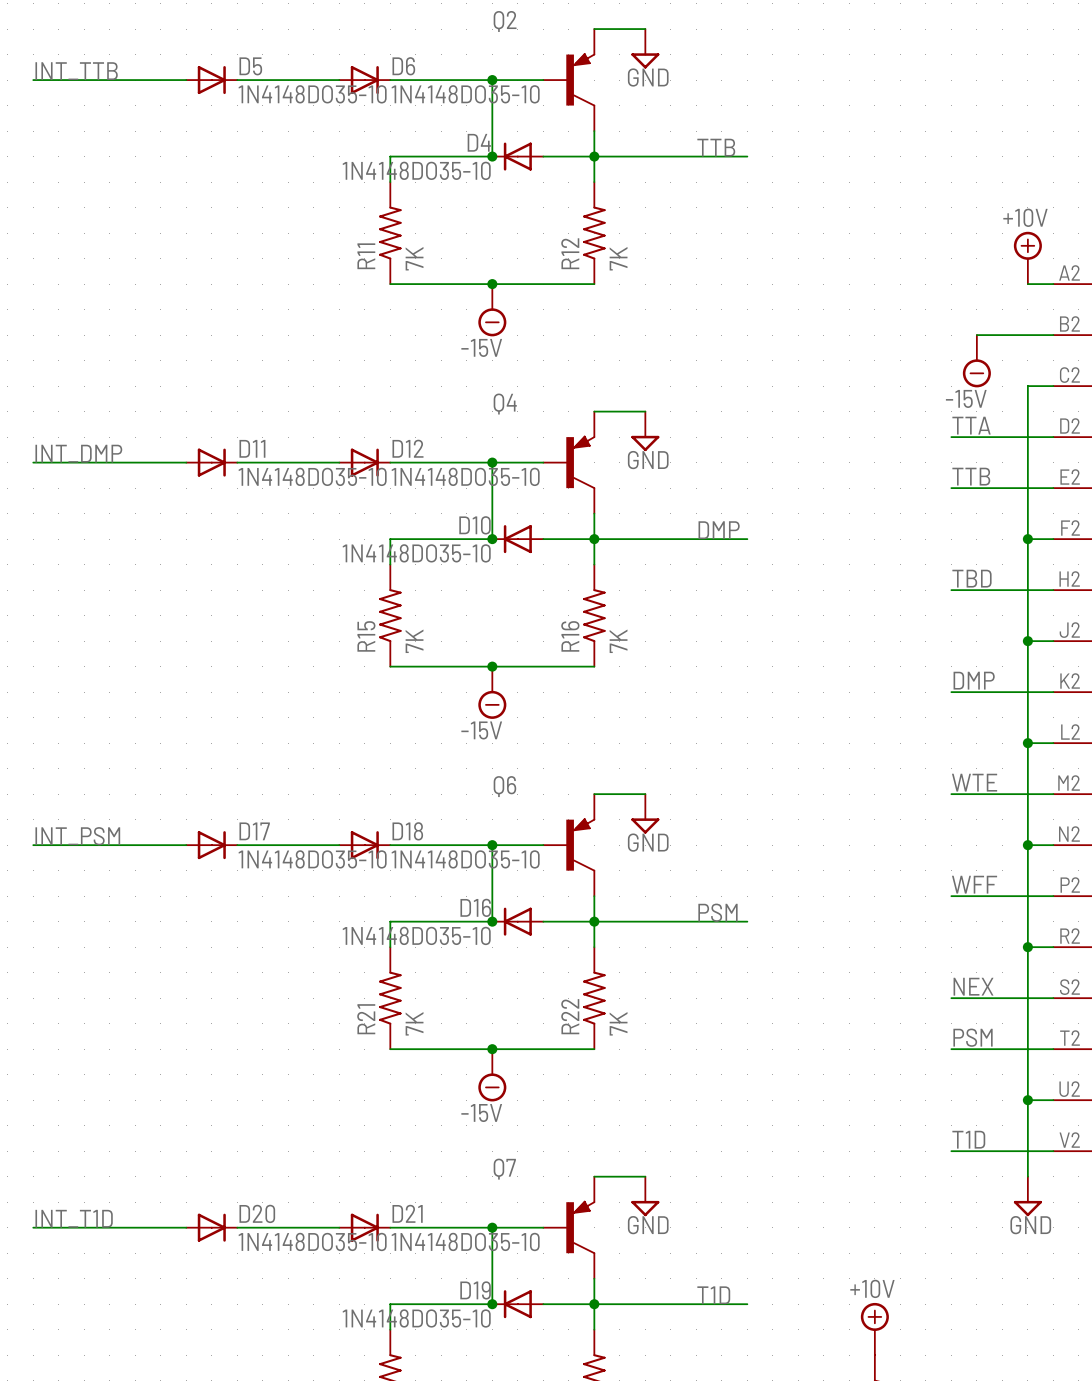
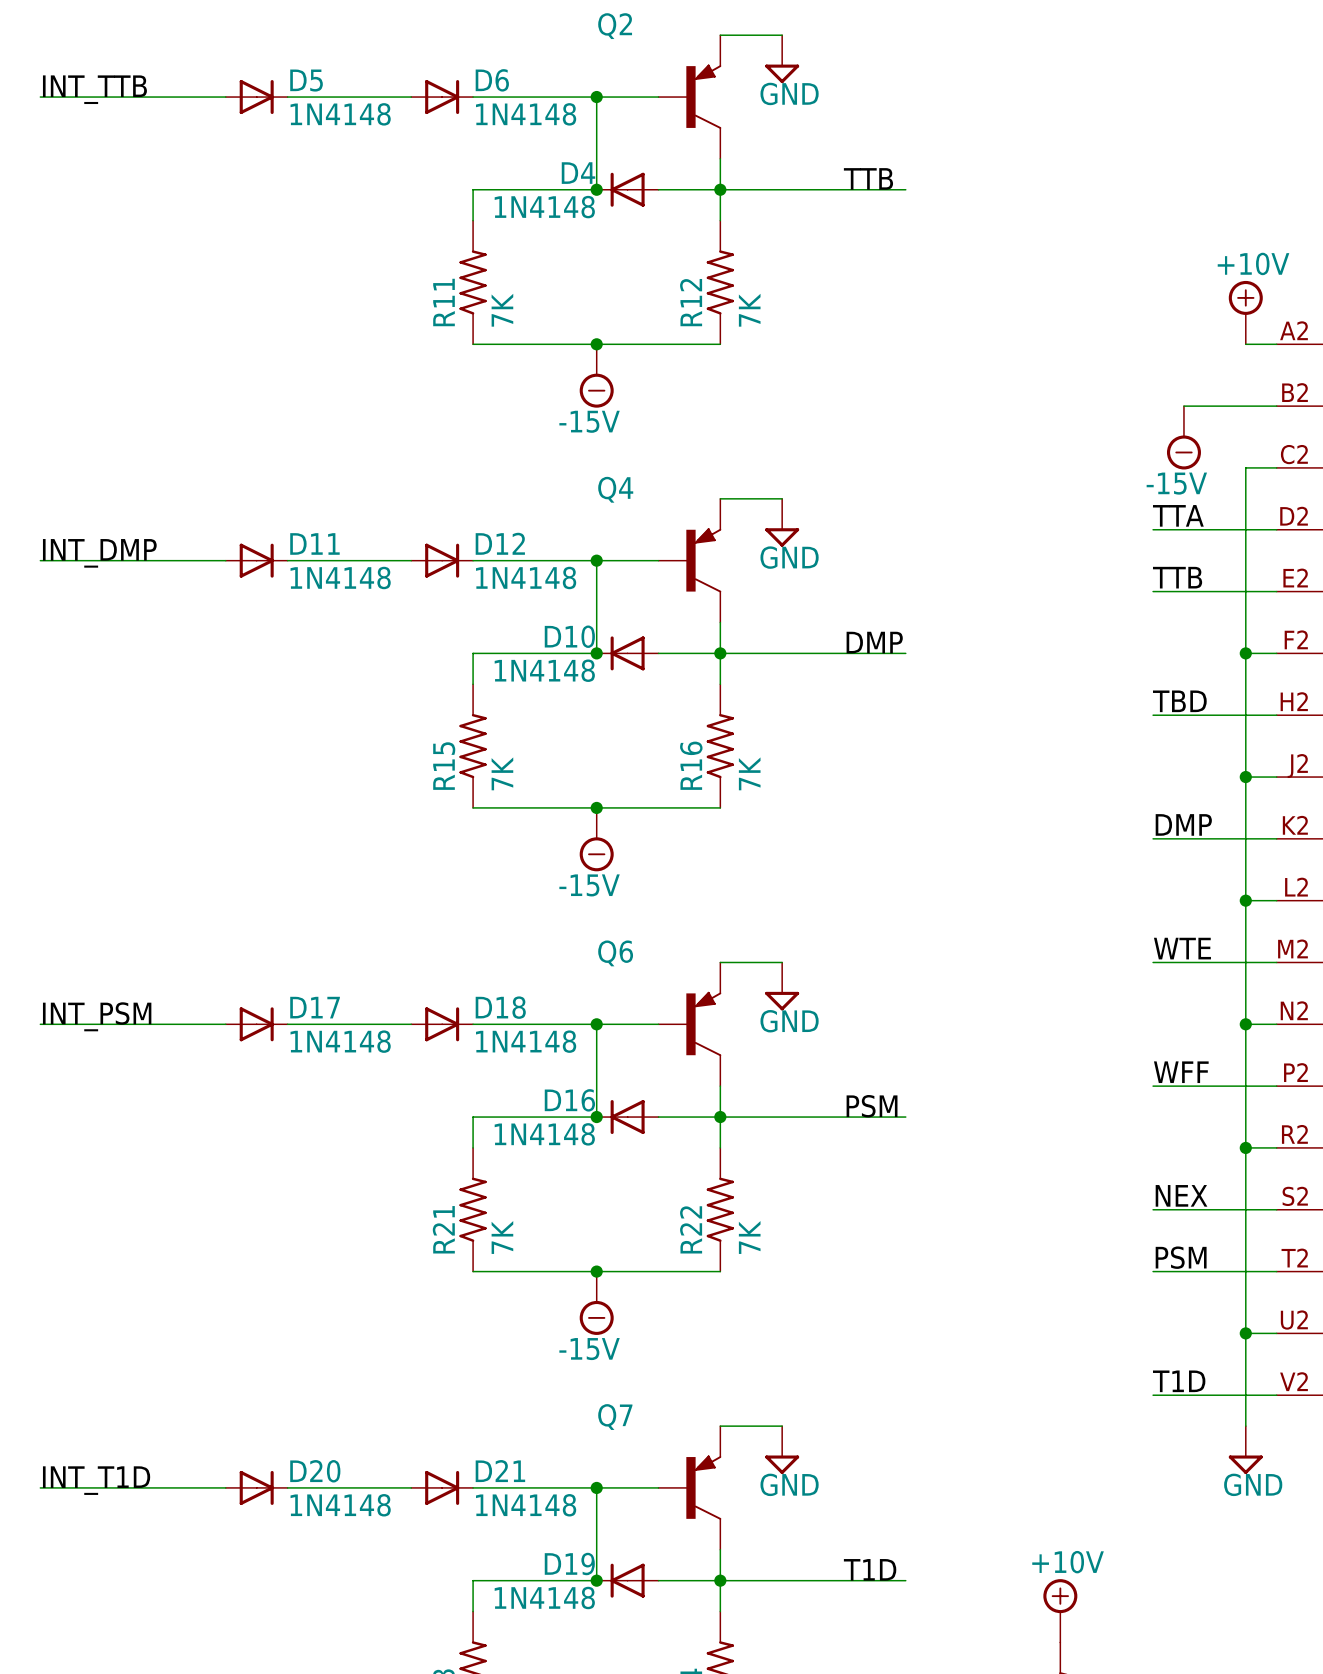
D5 value: 1N4148DO35-10 (312, 94) -> 1N4148 (340, 114)
D6 value: 1N4148DO35-10 (465, 94) -> 1N4148 (526, 114)
D4 value: 1N4148DO35-10 (416, 170) -> 1N4148 (544, 207)
D11 value: 1N4148DO35-10 (312, 476) -> 1N4148 (340, 577)
D12 value: 1N4148DO35-10 (465, 476) -> 1N4148 (526, 577)
D10 value: 1N4148DO35-10 (416, 553) -> 1N4148 (544, 670)
D17 value: 1N4148DO35-10 (312, 859) -> 1N4148 (340, 1041)
D18 value: 1N4148DO35-10 (465, 859) -> 1N4148 (526, 1041)
D16 value: 1N4148DO35-10 (416, 935) -> 1N4148 (544, 1134)
D20 value: 1N4148DO35-10 (312, 1241) -> 1N4148 (340, 1505)
D21 value: 1N4148DO35-10 (465, 1241) -> 1N4148 (526, 1505)
D19 value: 1N4148DO35-10 (416, 1318) -> 1N4148 (544, 1598)

